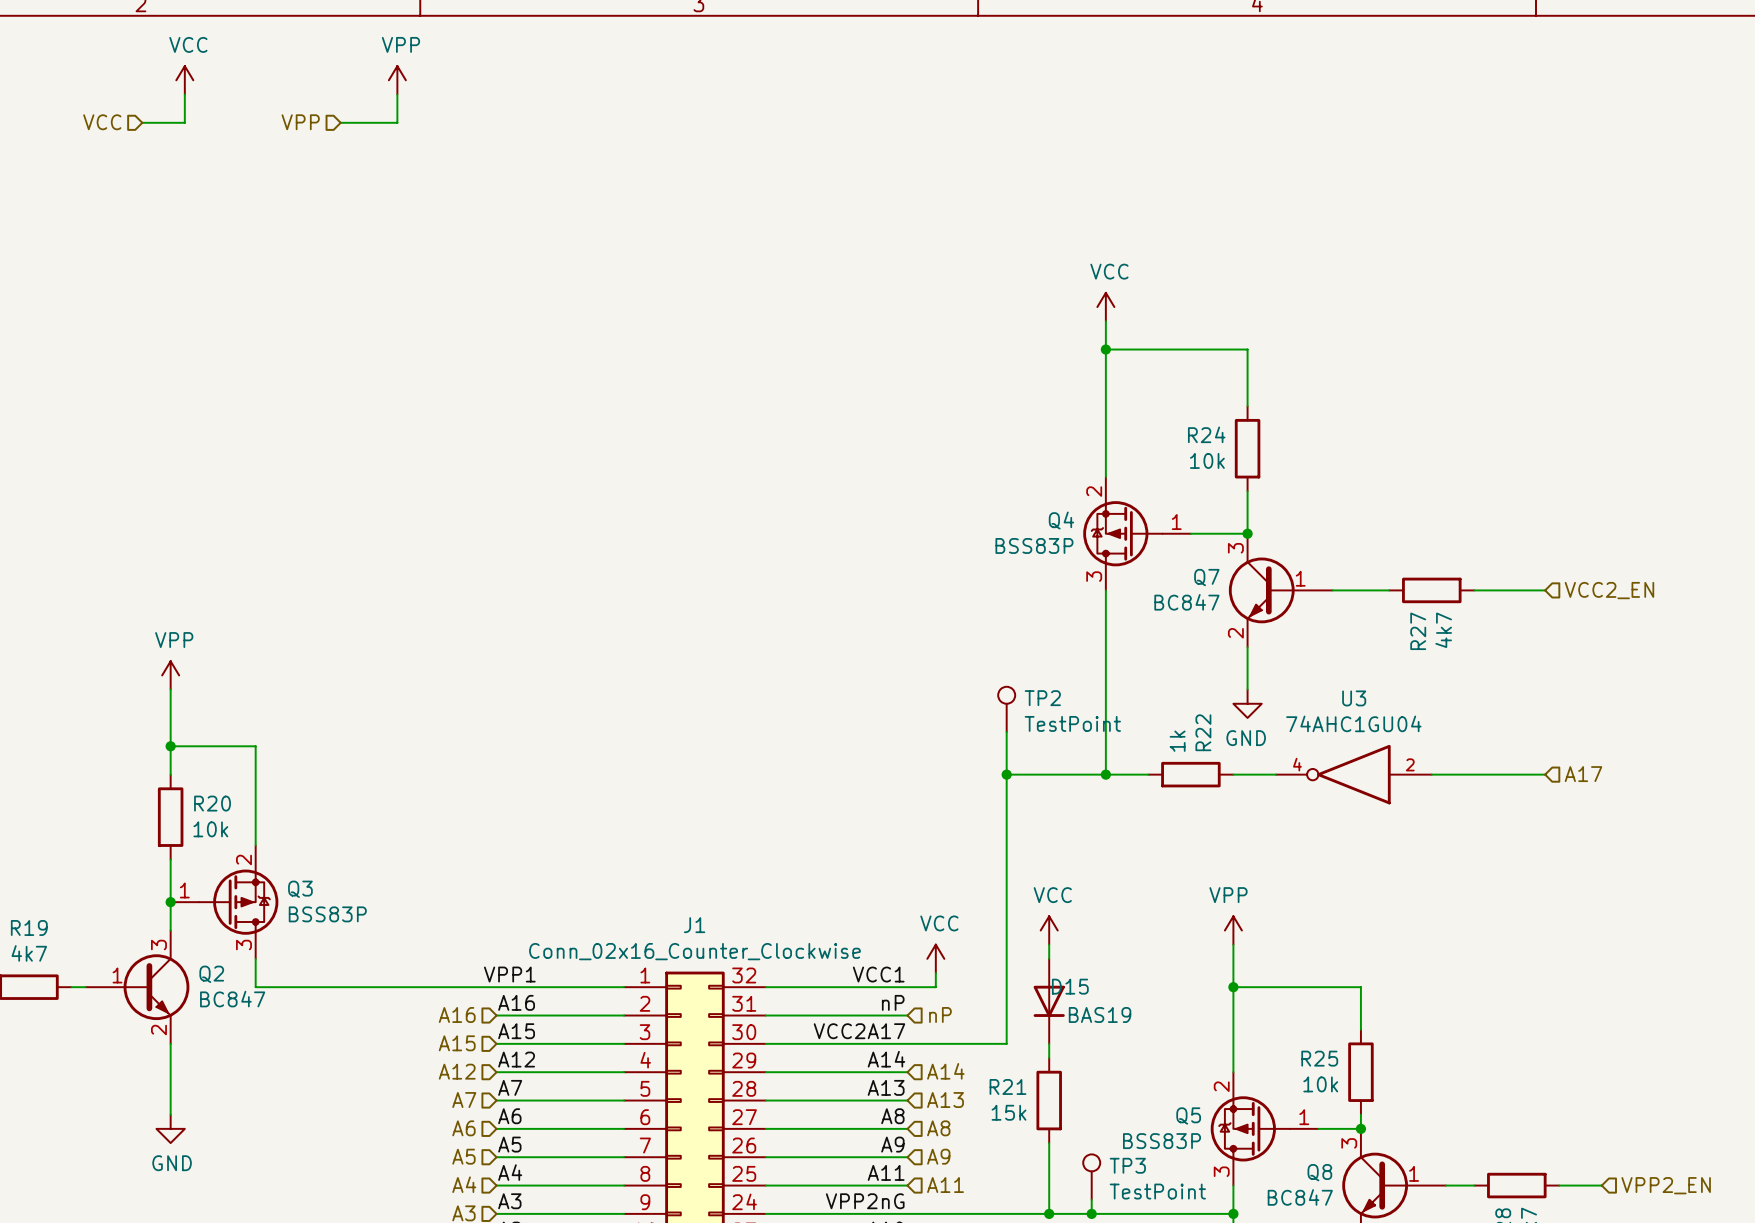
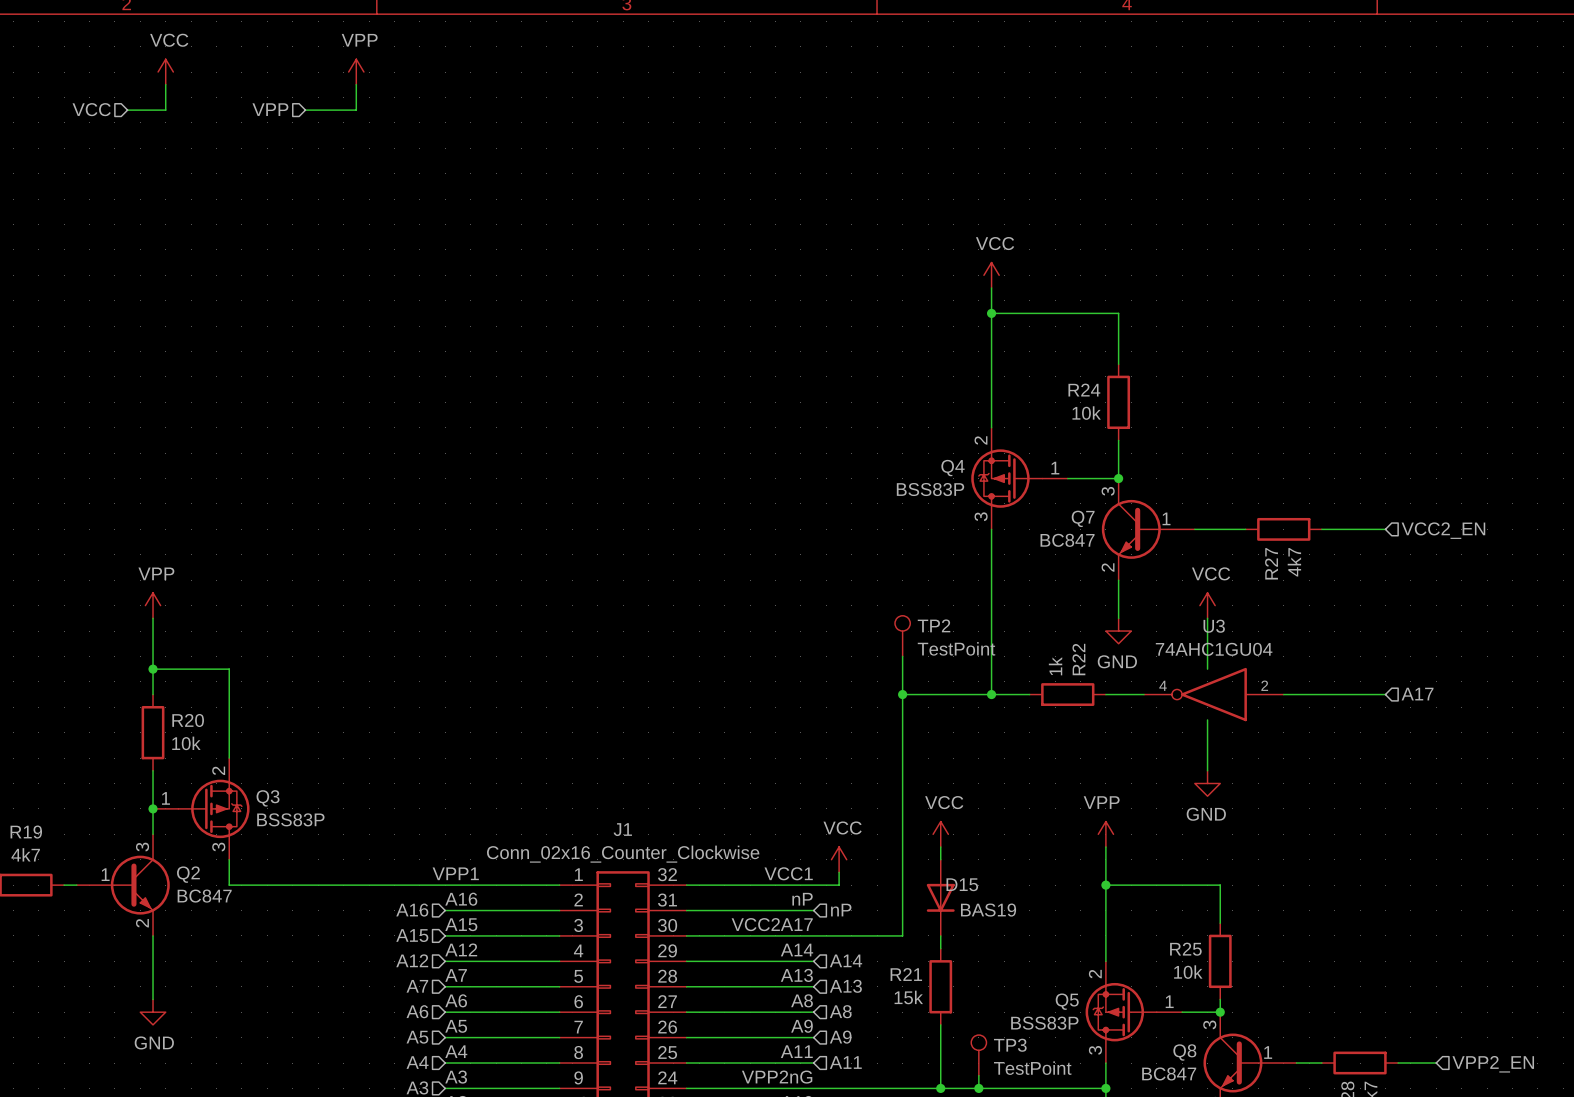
power symbol: none -> VCC (1207, 605)
wire: none -> (1207, 618) (1207, 669)
wire: none -> (1207, 719) (1207, 770)
power symbol: none -> GND (1207, 783)

